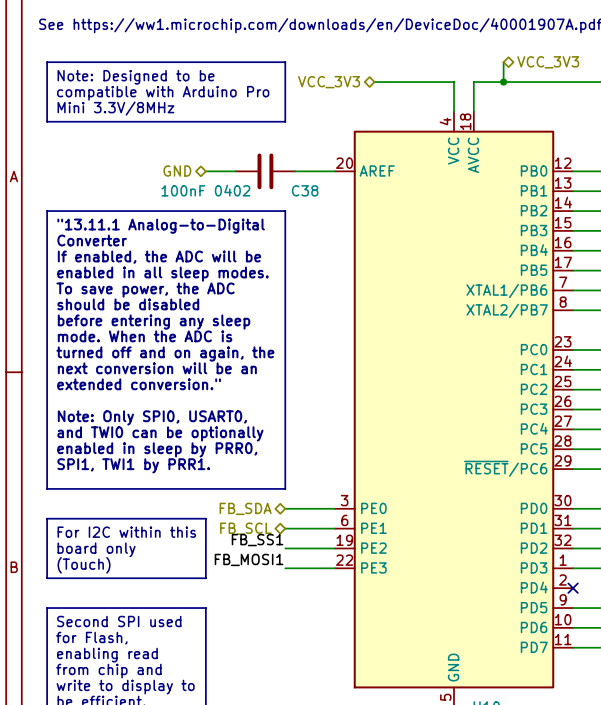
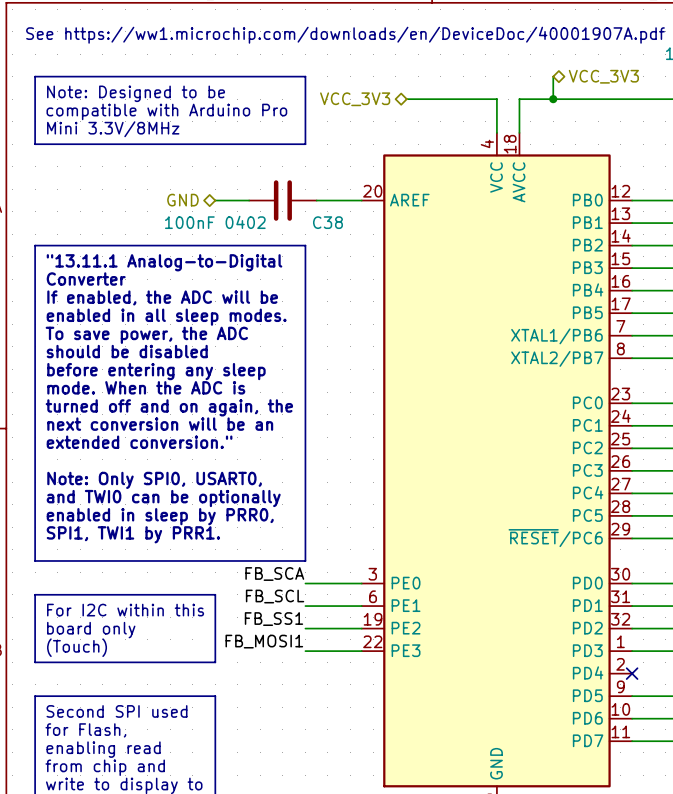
label: none -> FB_SCA (274, 574)
hierarchical label: FB_SDA (245, 508) -> none
label: none -> FB_SCL (275, 596)
hierarchical label: FB_SCL (245, 528) -> none

